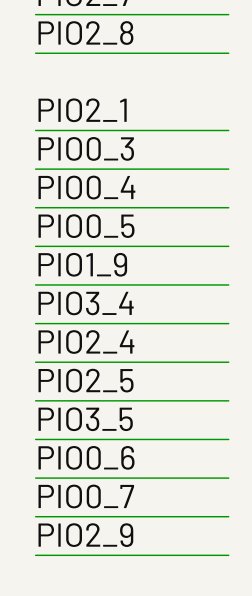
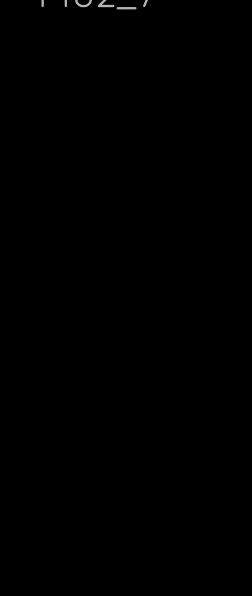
wire: (35, 14) (228, 14) -> none
label: PIO2_8 (85, 33) -> none
wire: (35, 53) (228, 53) -> none
label: PIO2_1 (82, 110) -> none
wire: (35, 130) (228, 130) -> none
label: PIO0_3 (86, 148) -> none
wire: (35, 169) (228, 169) -> none
label: PIO0_4 (86, 187) -> none
wire: (35, 207) (228, 207) -> none
label: PIO0_5 (86, 226) -> none
wire: (35, 246) (228, 246) -> none
label: PIO1_9 (82, 264) -> none
wire: (35, 284) (228, 284) -> none
label: PIO3_4 (86, 303) -> none
wire: (35, 323) (228, 323) -> none
label: PIO2_4 (86, 342) -> none
wire: (35, 362) (228, 362) -> none
label: PIO2_5 (86, 380) -> none
wire: (35, 400) (228, 400) -> none
label: PIO3_5 (85, 419) -> none
wire: (35, 439) (228, 439) -> none
label: PIO0_6 (86, 457) -> none
wire: (35, 478) (228, 478) -> none
label: PIO0_7 (86, 496) -> none
wire: (35, 516) (228, 516) -> none
label: PIO2_9 (85, 535) -> none
wire: (35, 555) (228, 555) -> none

